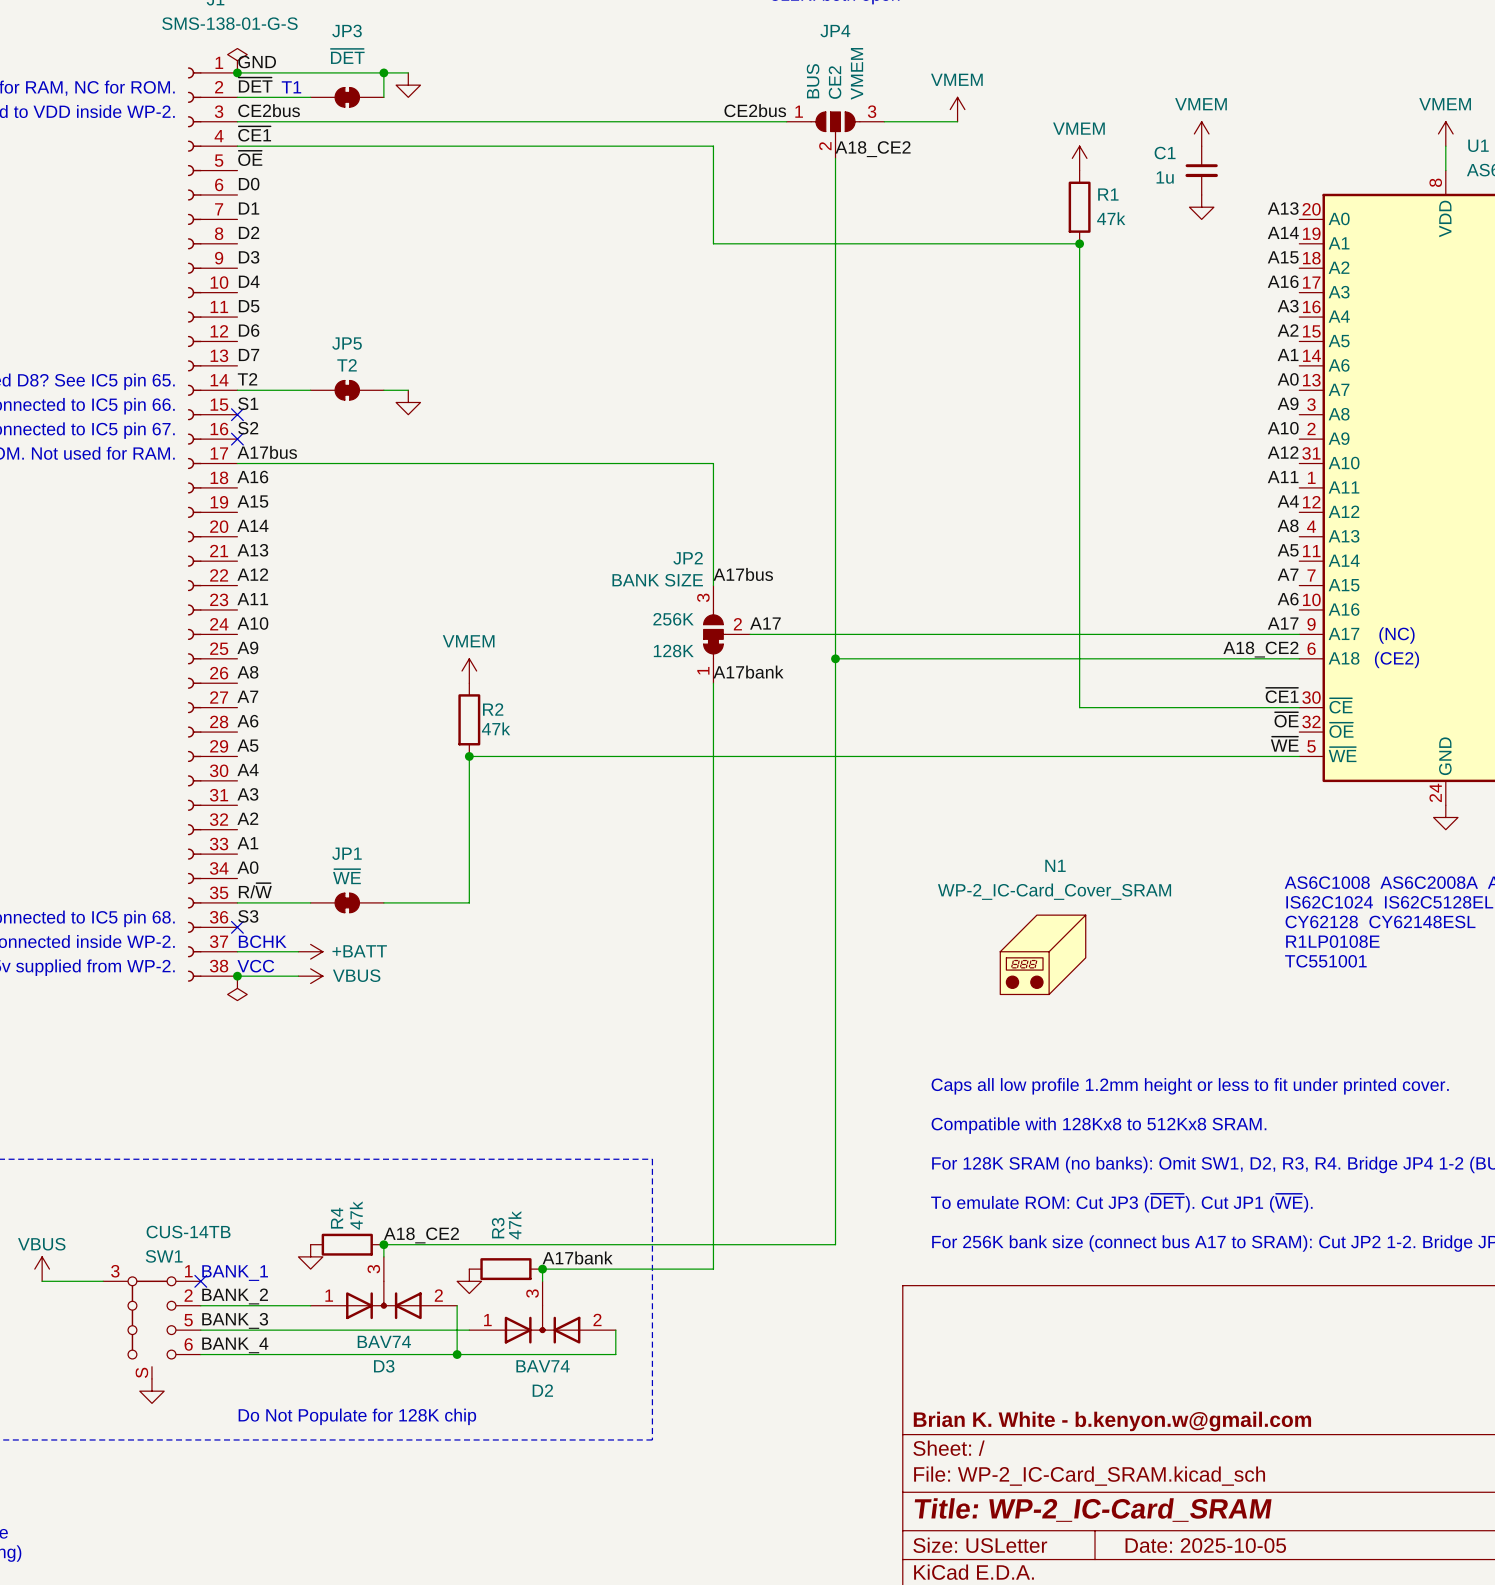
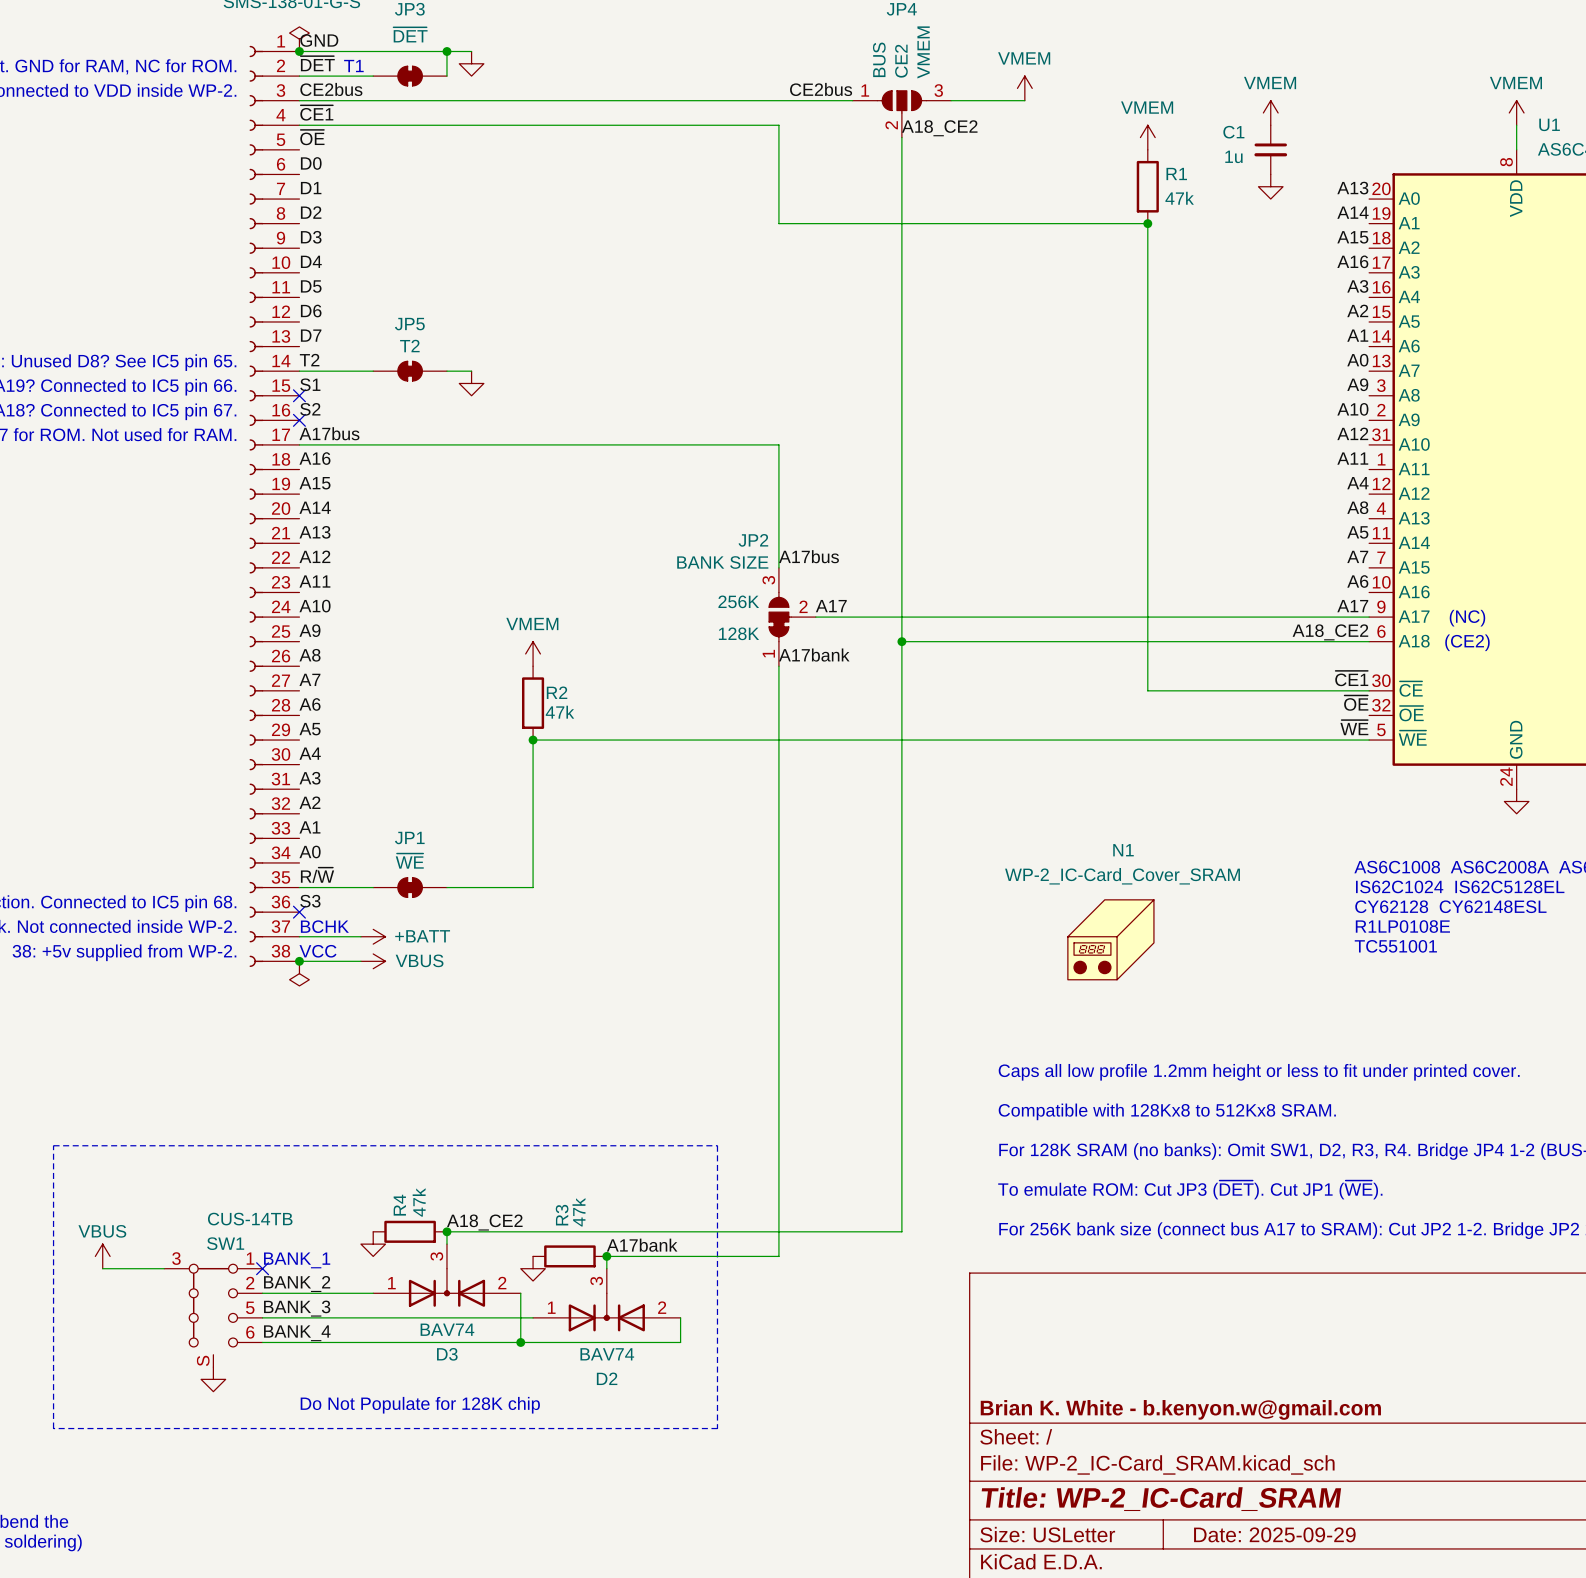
title block: Date: 2025-10-05 (1205, 1545) -> Date: 2025-09-29 (1274, 1534)

